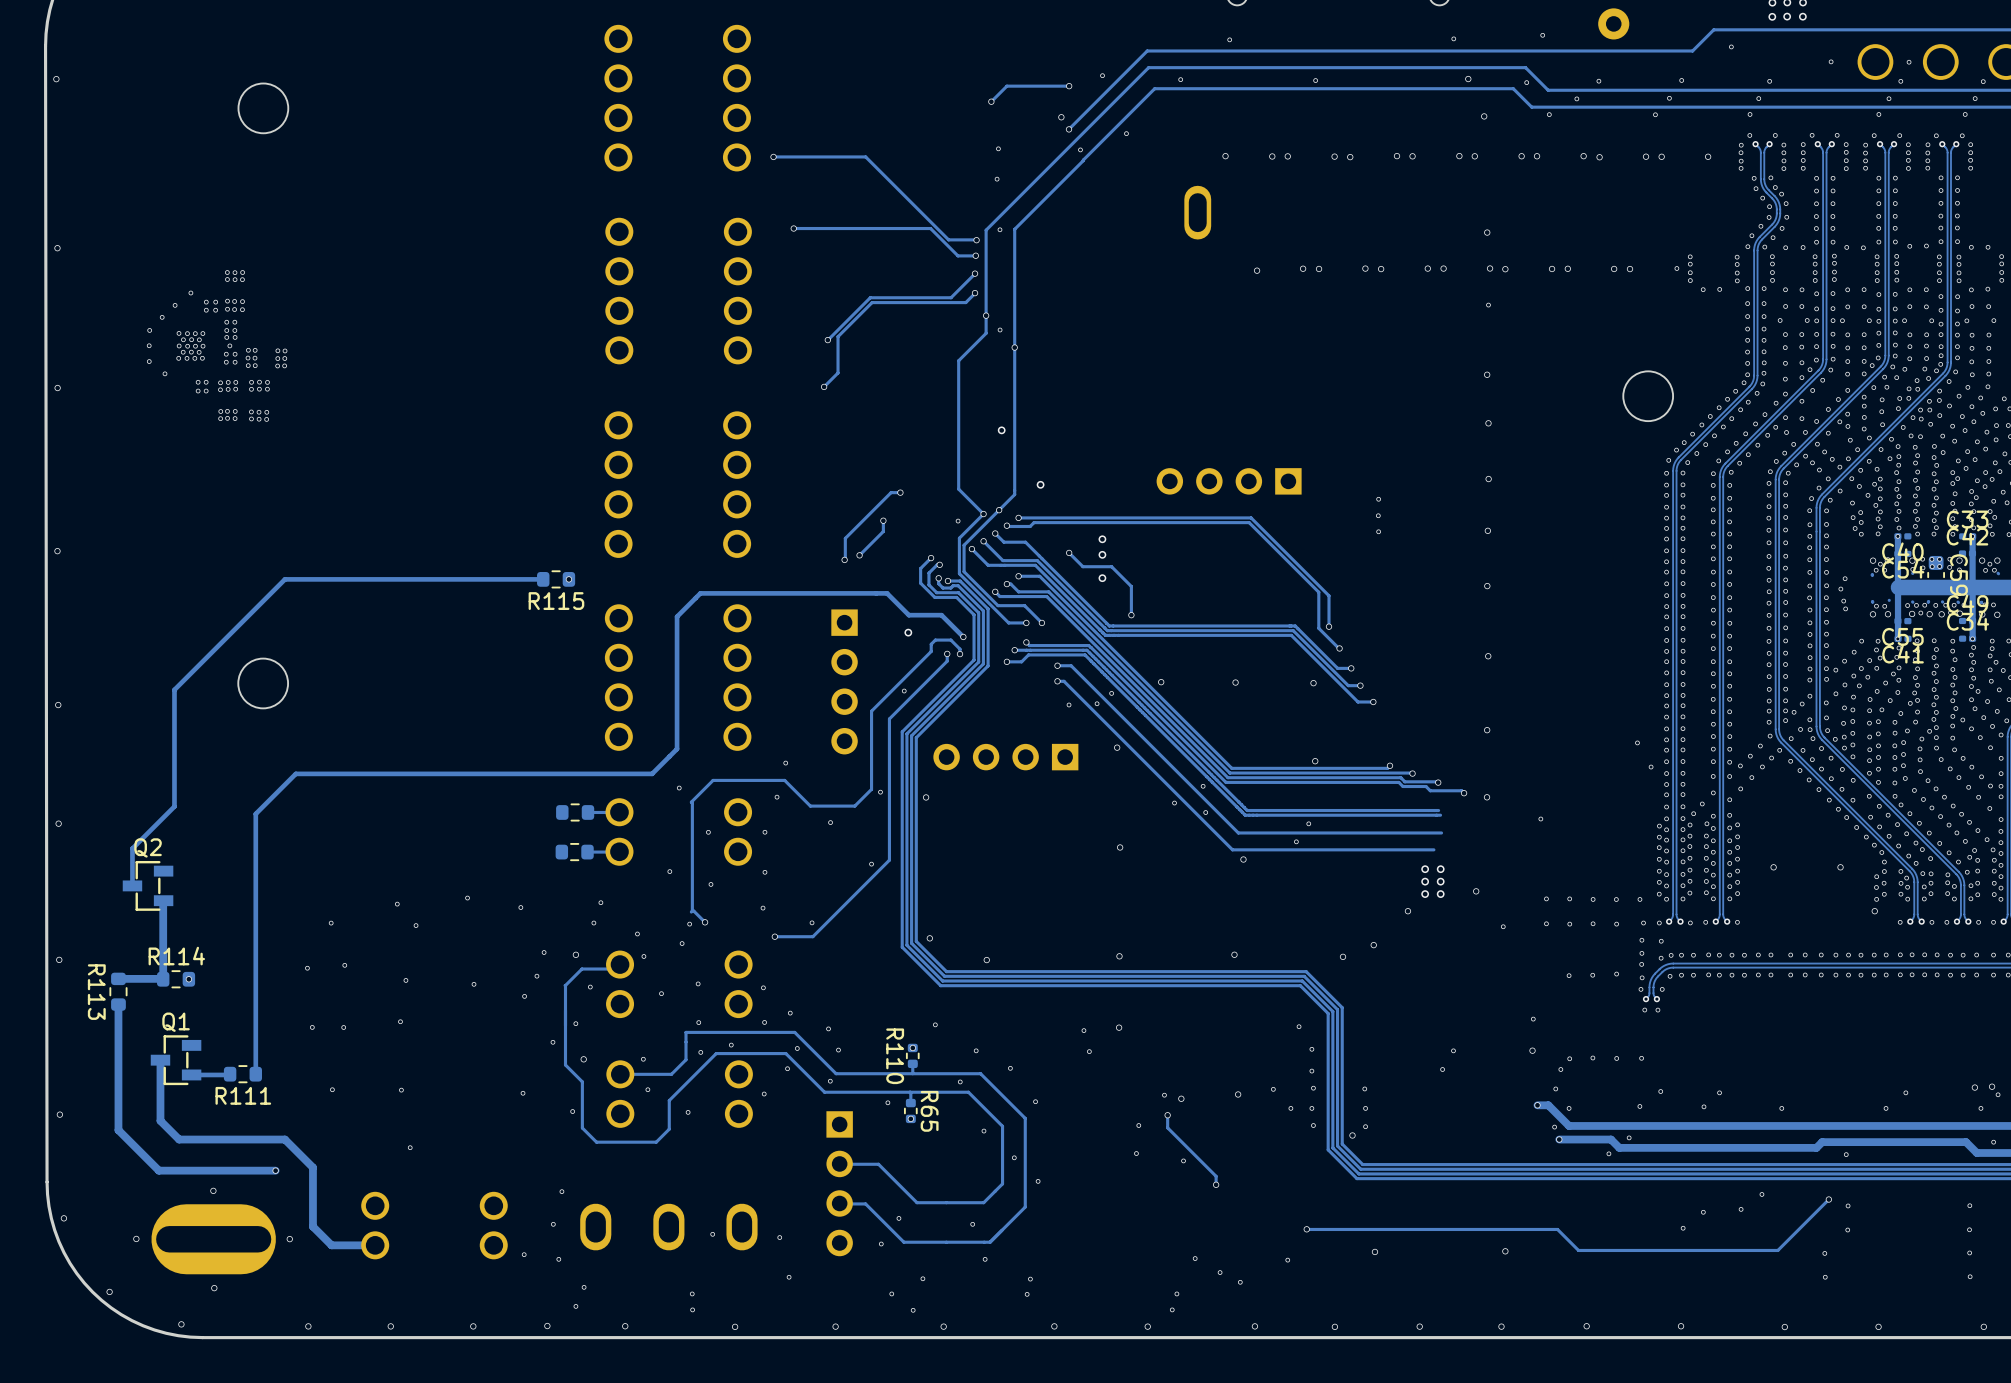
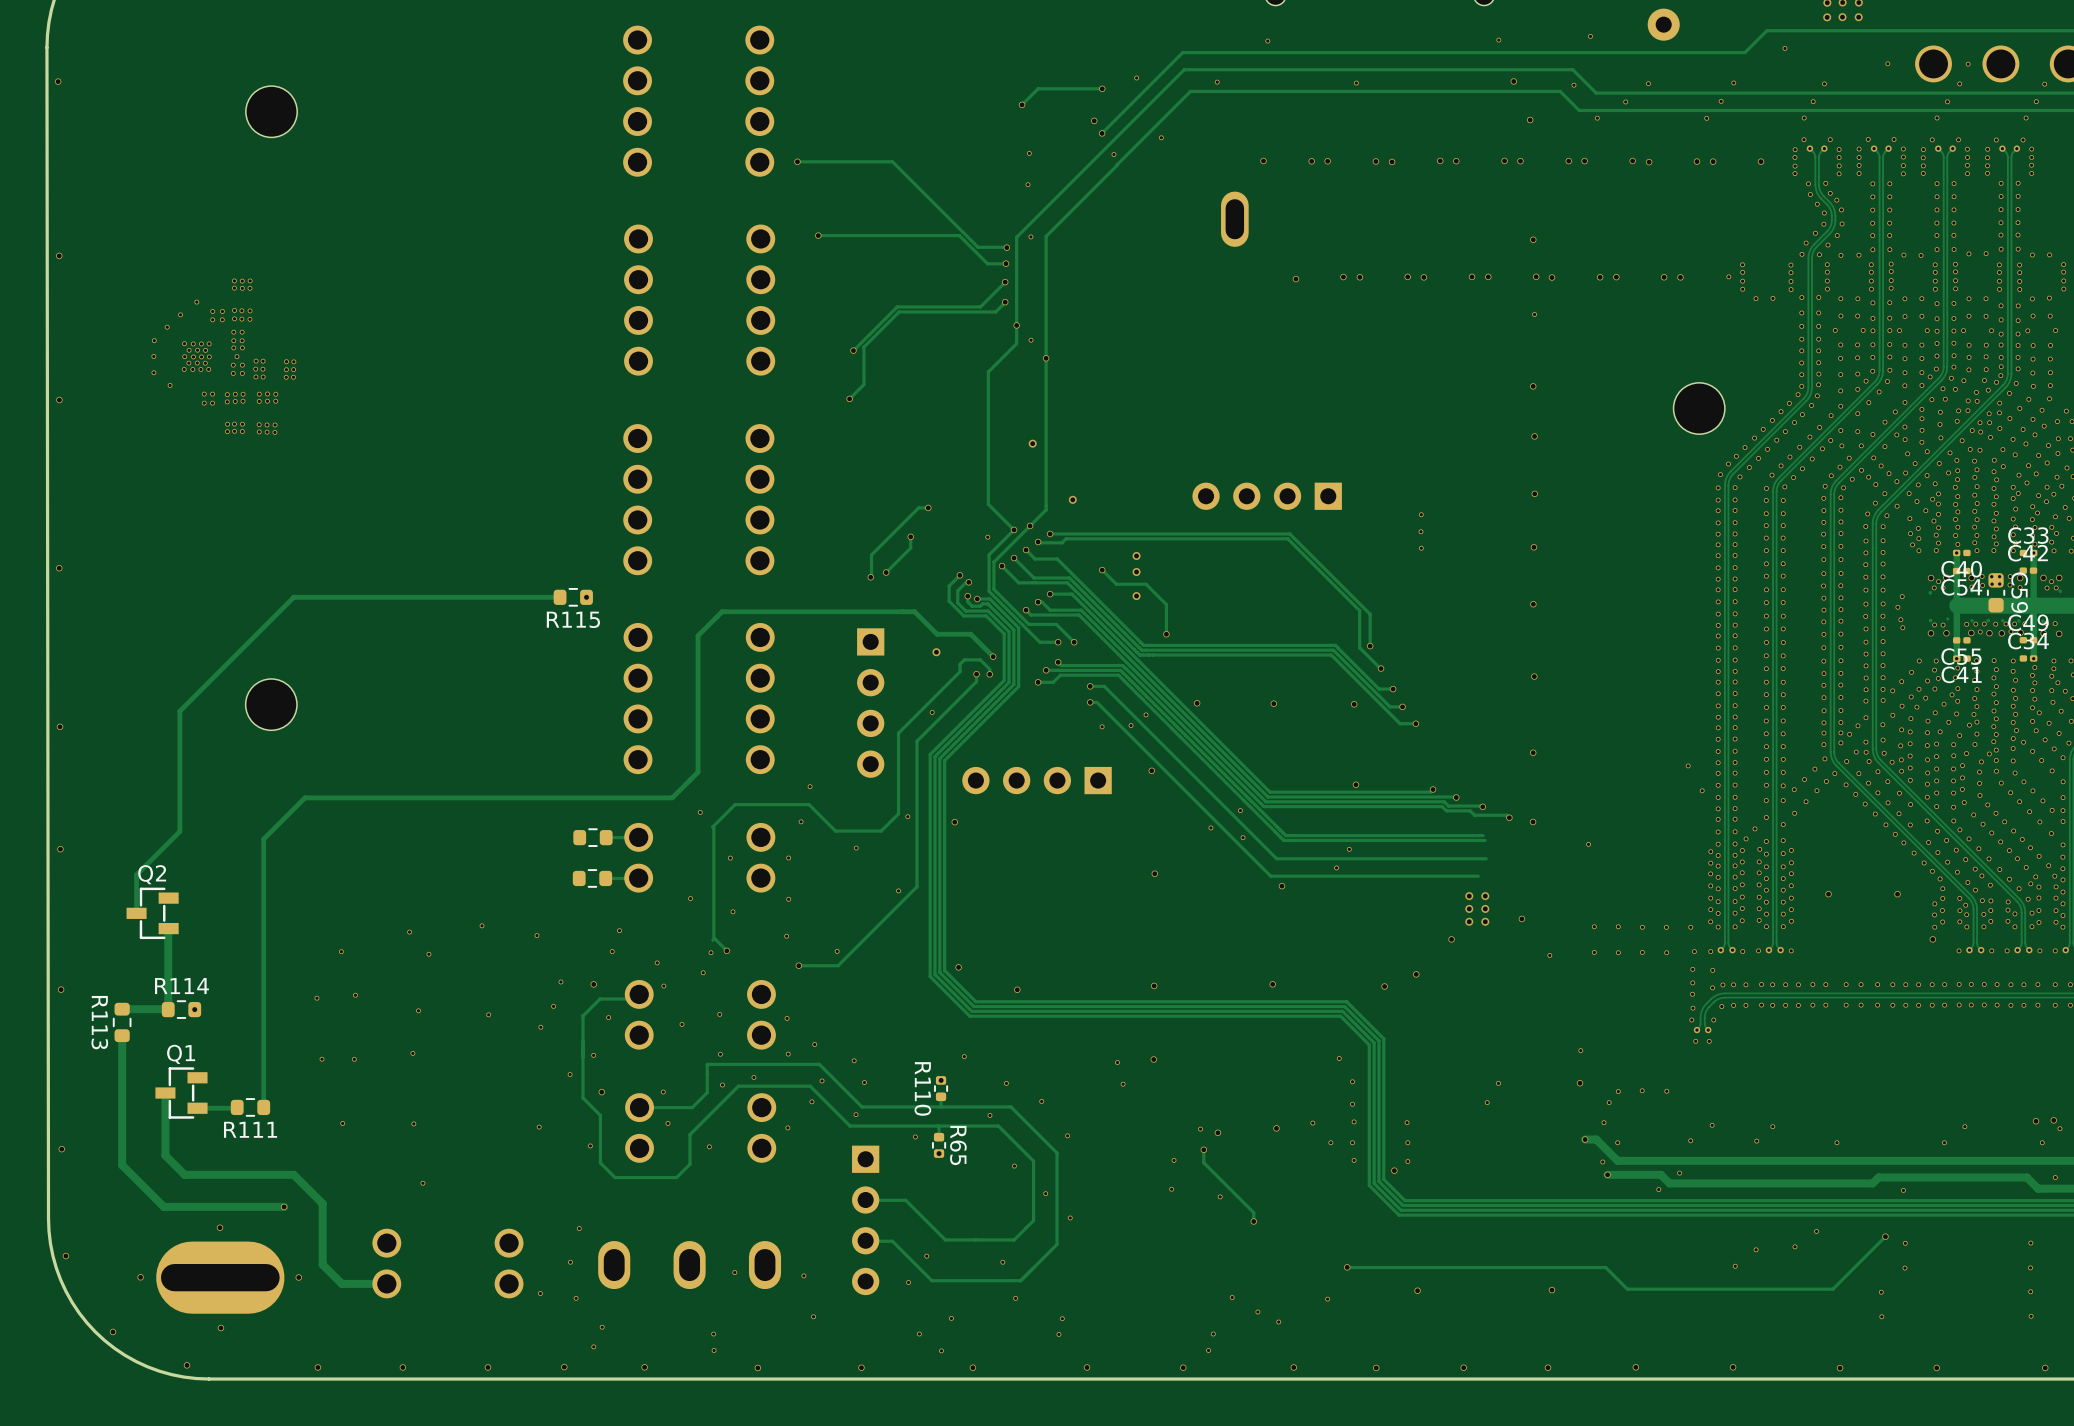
via: (1616, 974) -> none
via: (1569, 975) -> none
via: (1592, 975) -> none
via: (1641, 1058) -> none

